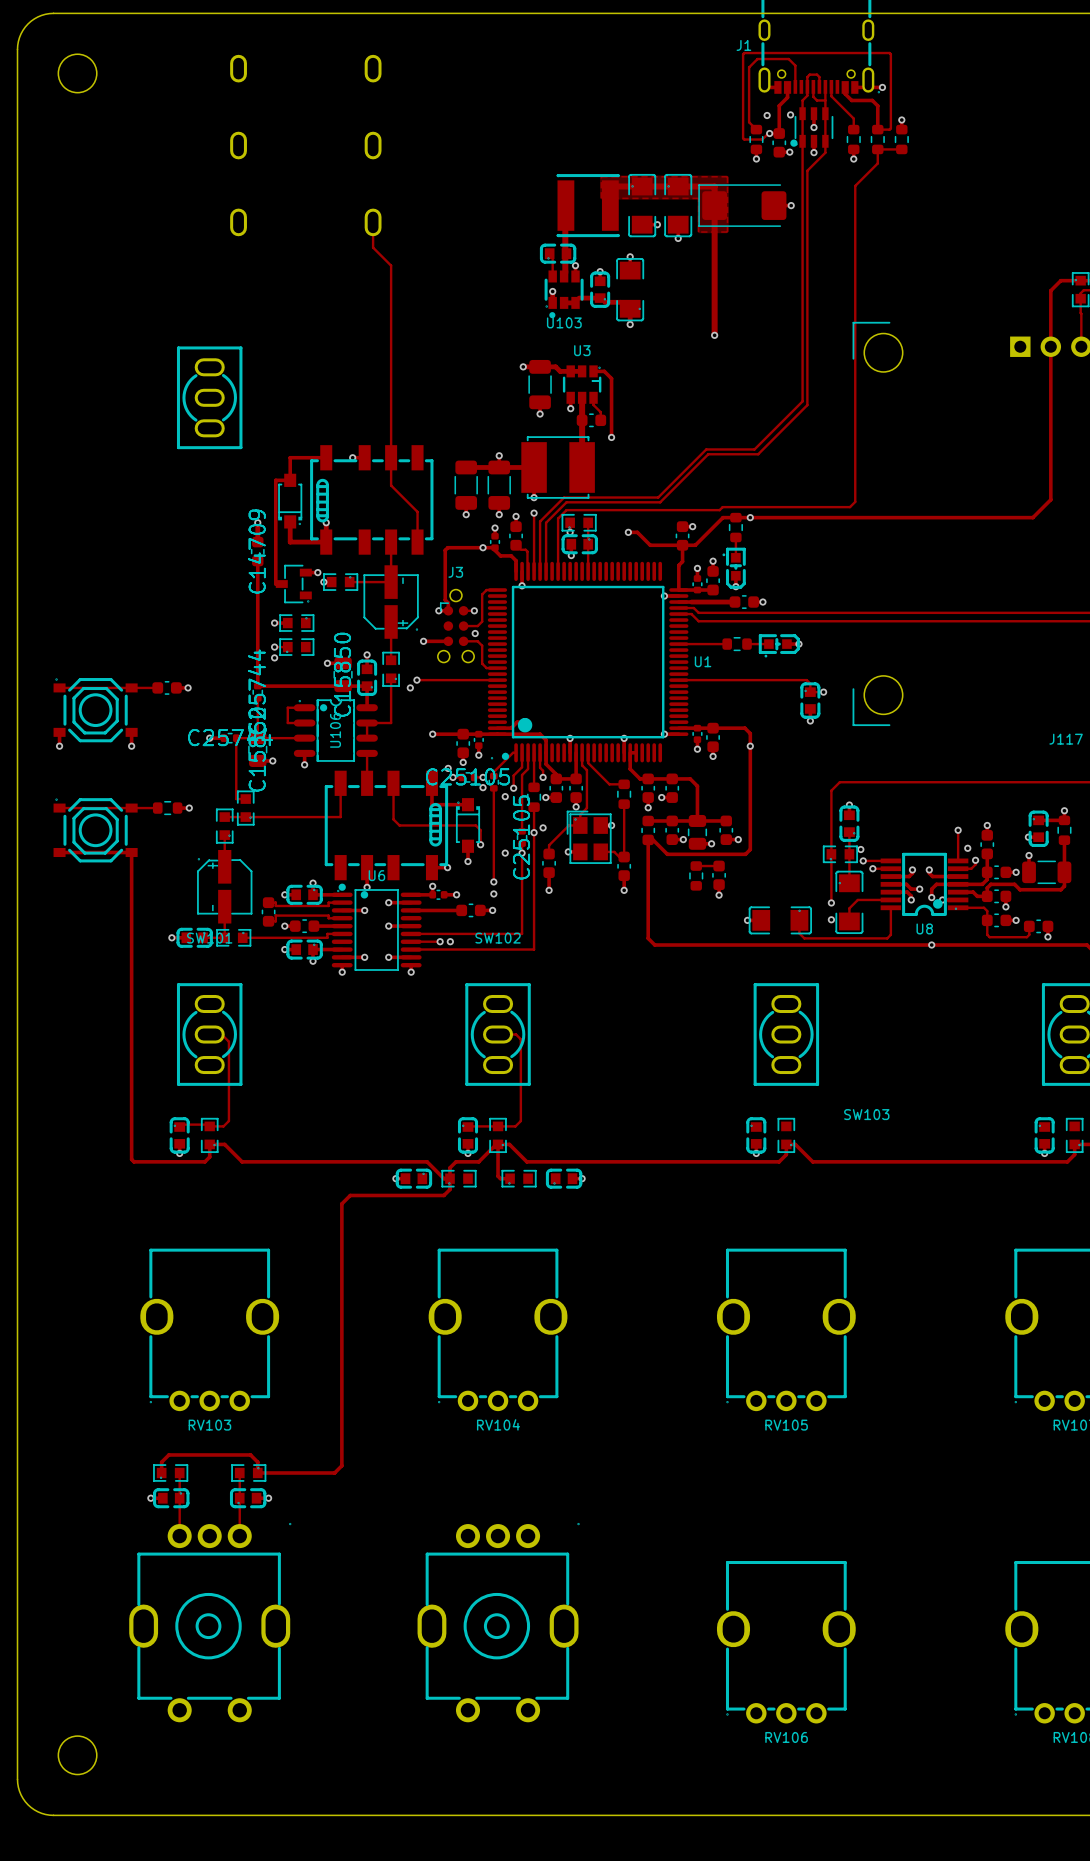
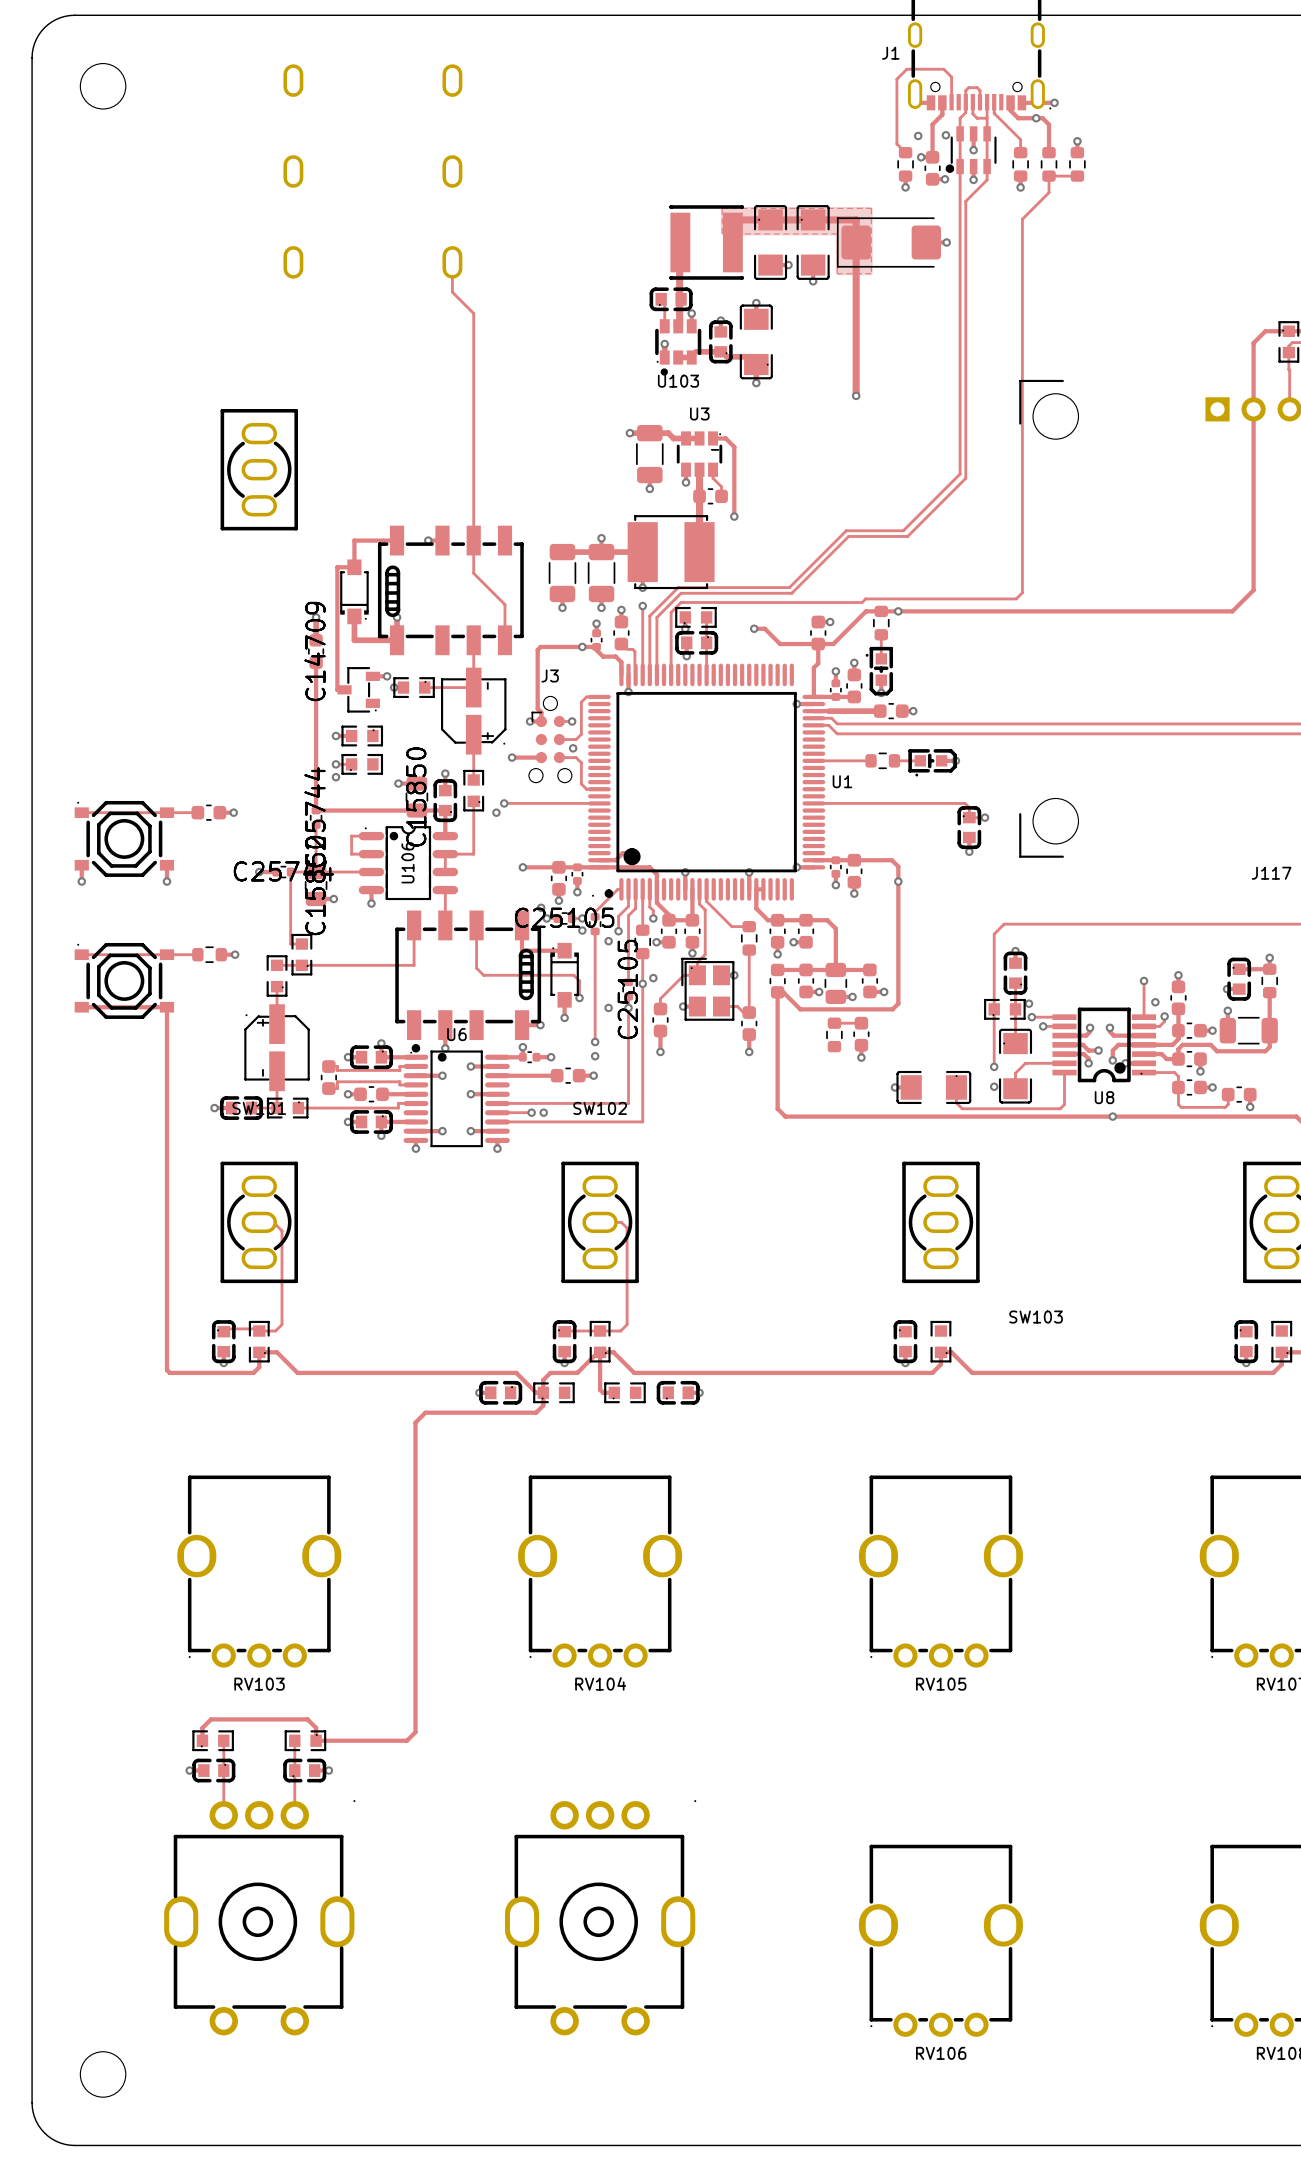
via: none -> (1036, 118)
track: (877, 129) (890, 128) (889, 53) (744, 53) (743, 138) (762, 139) (769, 133) -> none

